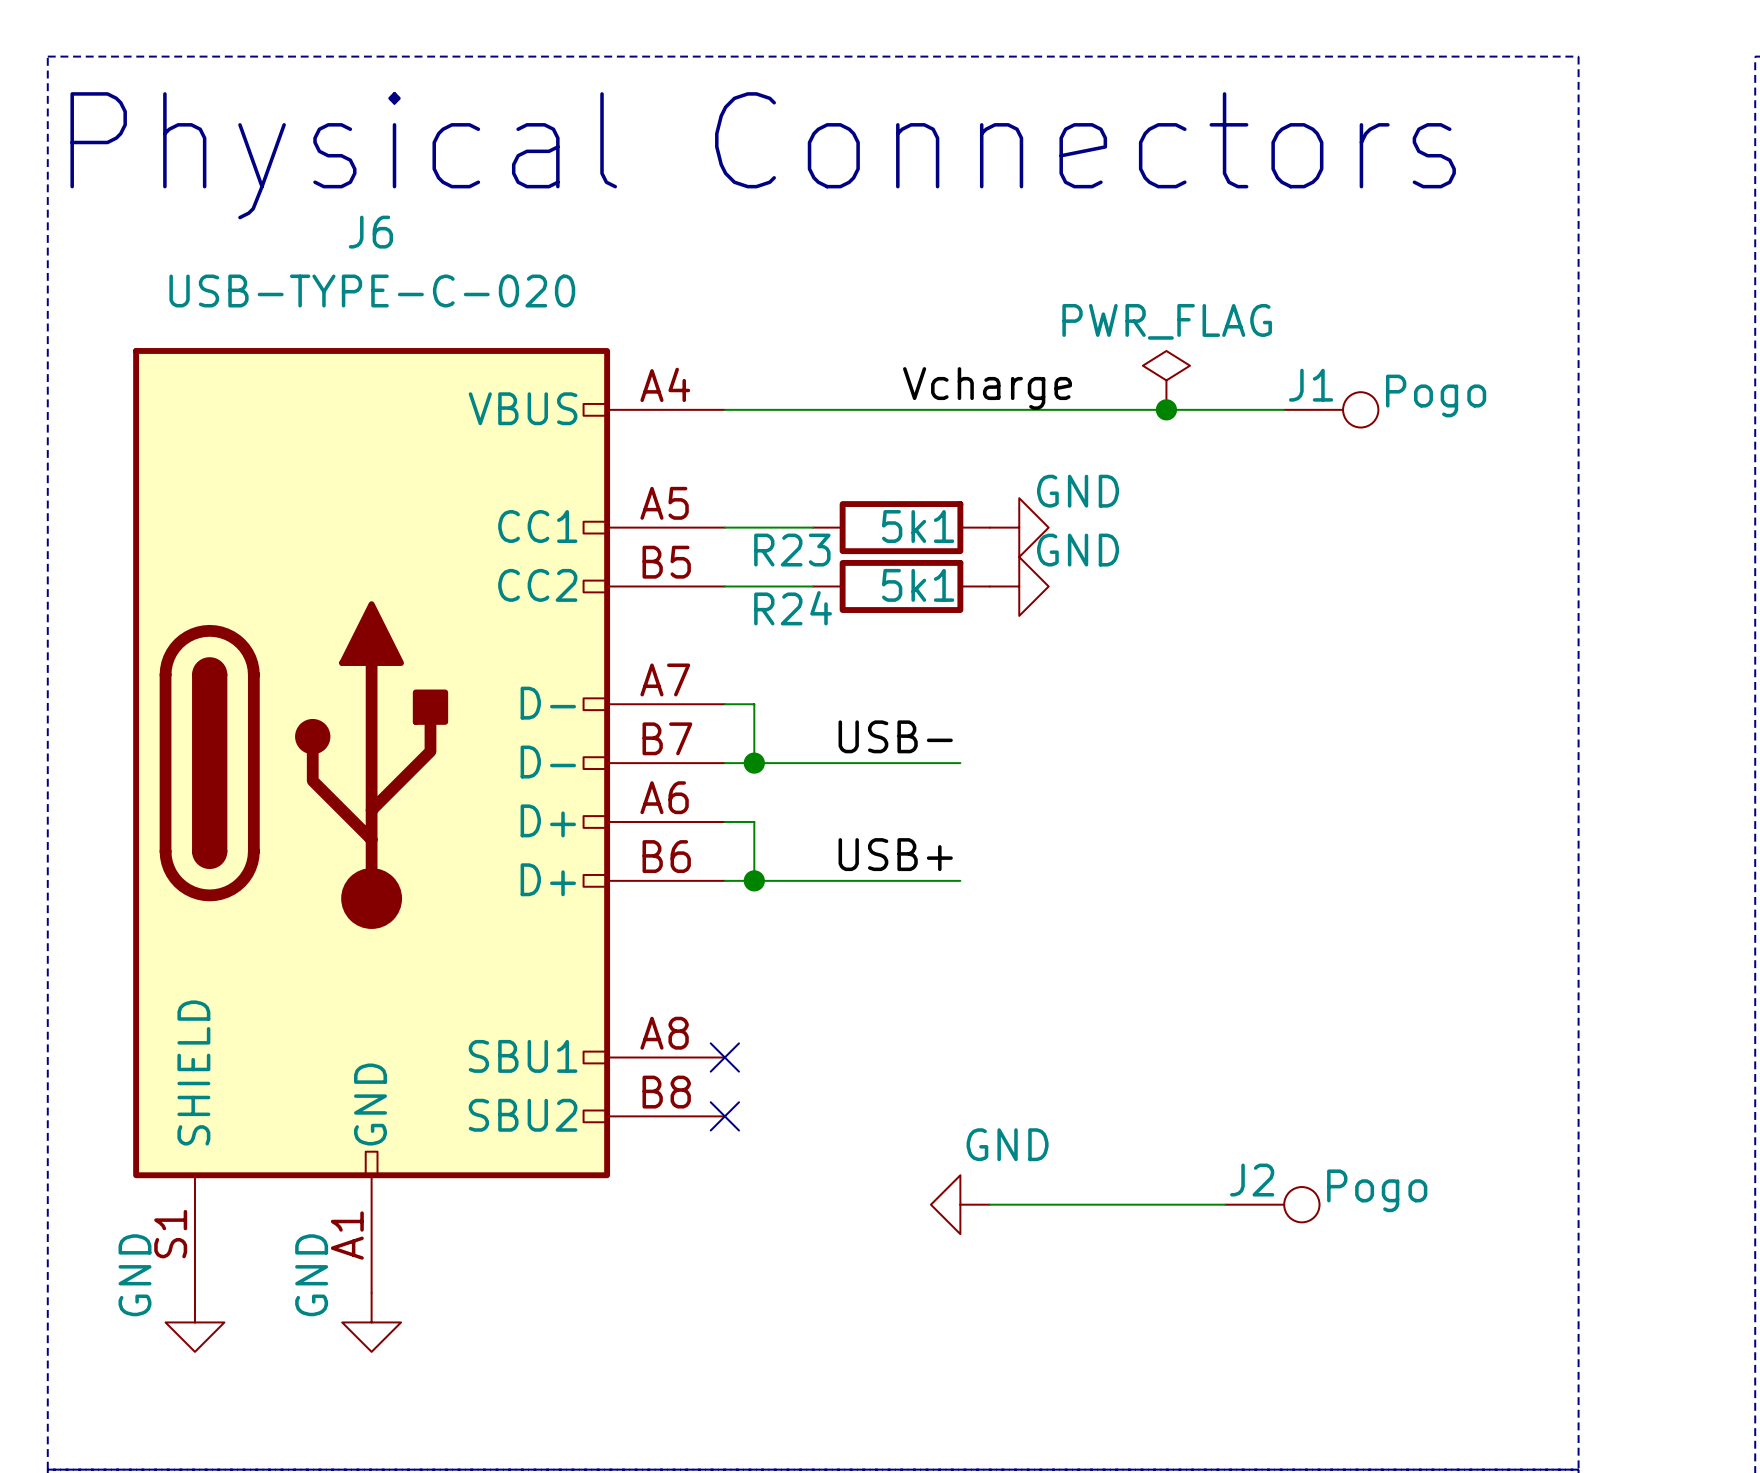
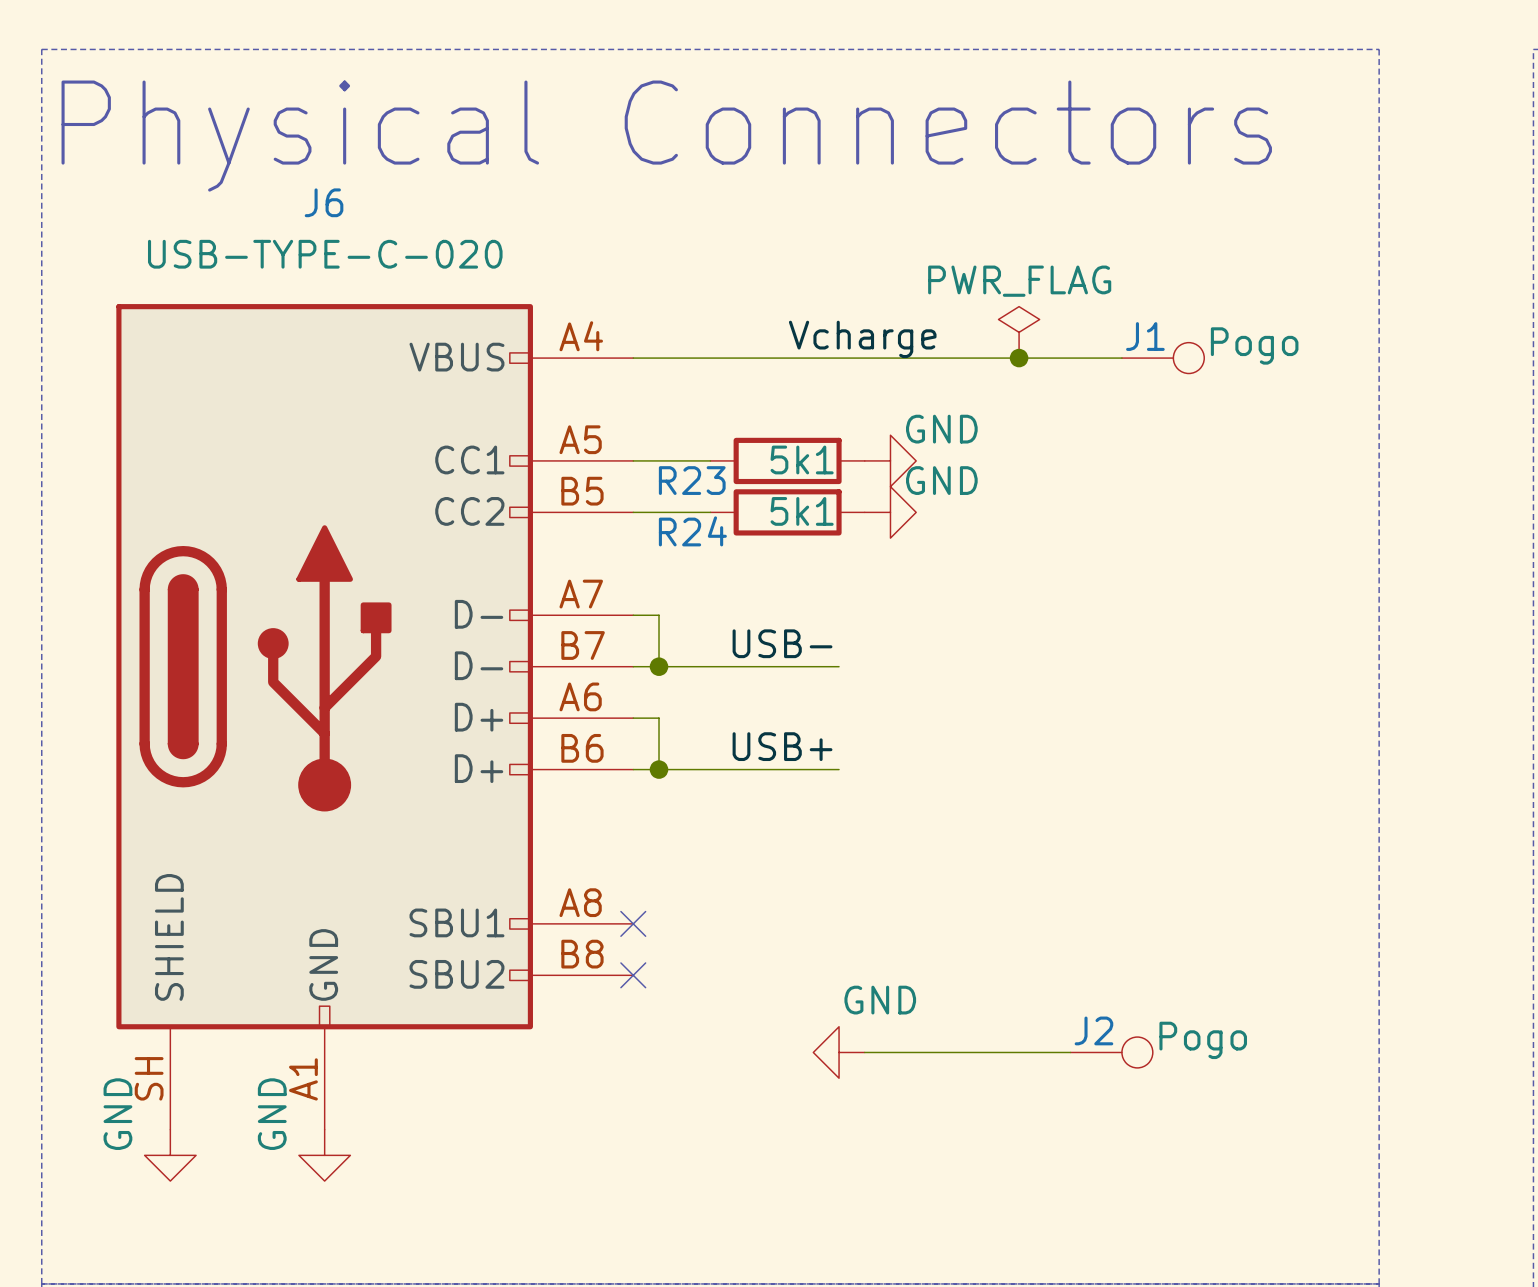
J6 pin number: S1 (170, 1234) -> SH (149, 1078)

